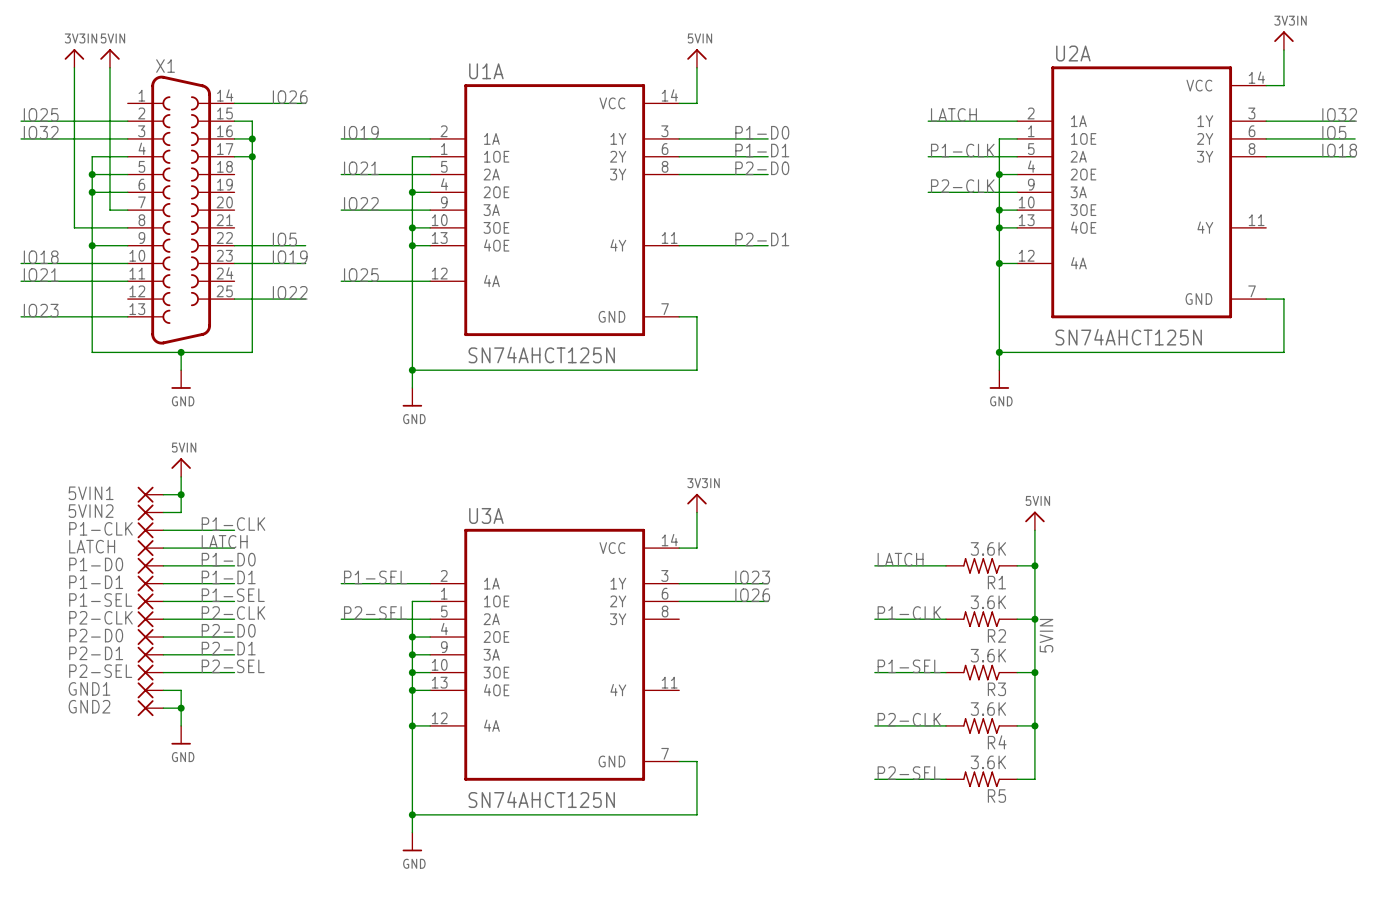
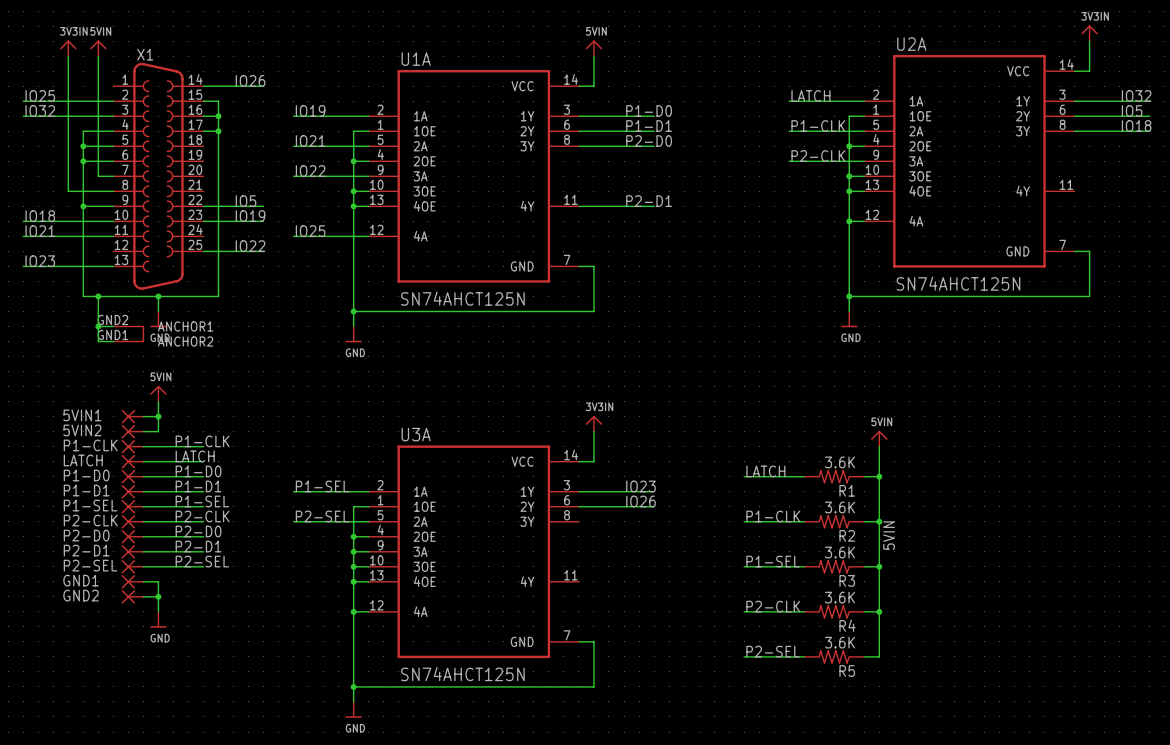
X1 symbol: [127, 75, 235, 345] -> [113, 62, 204, 342]
wire: none -> (98, 296) (98, 341) (113, 341)
junction: none -> (98, 296)
wire: none -> (98, 326) (113, 326)
junction: none -> (98, 326)

